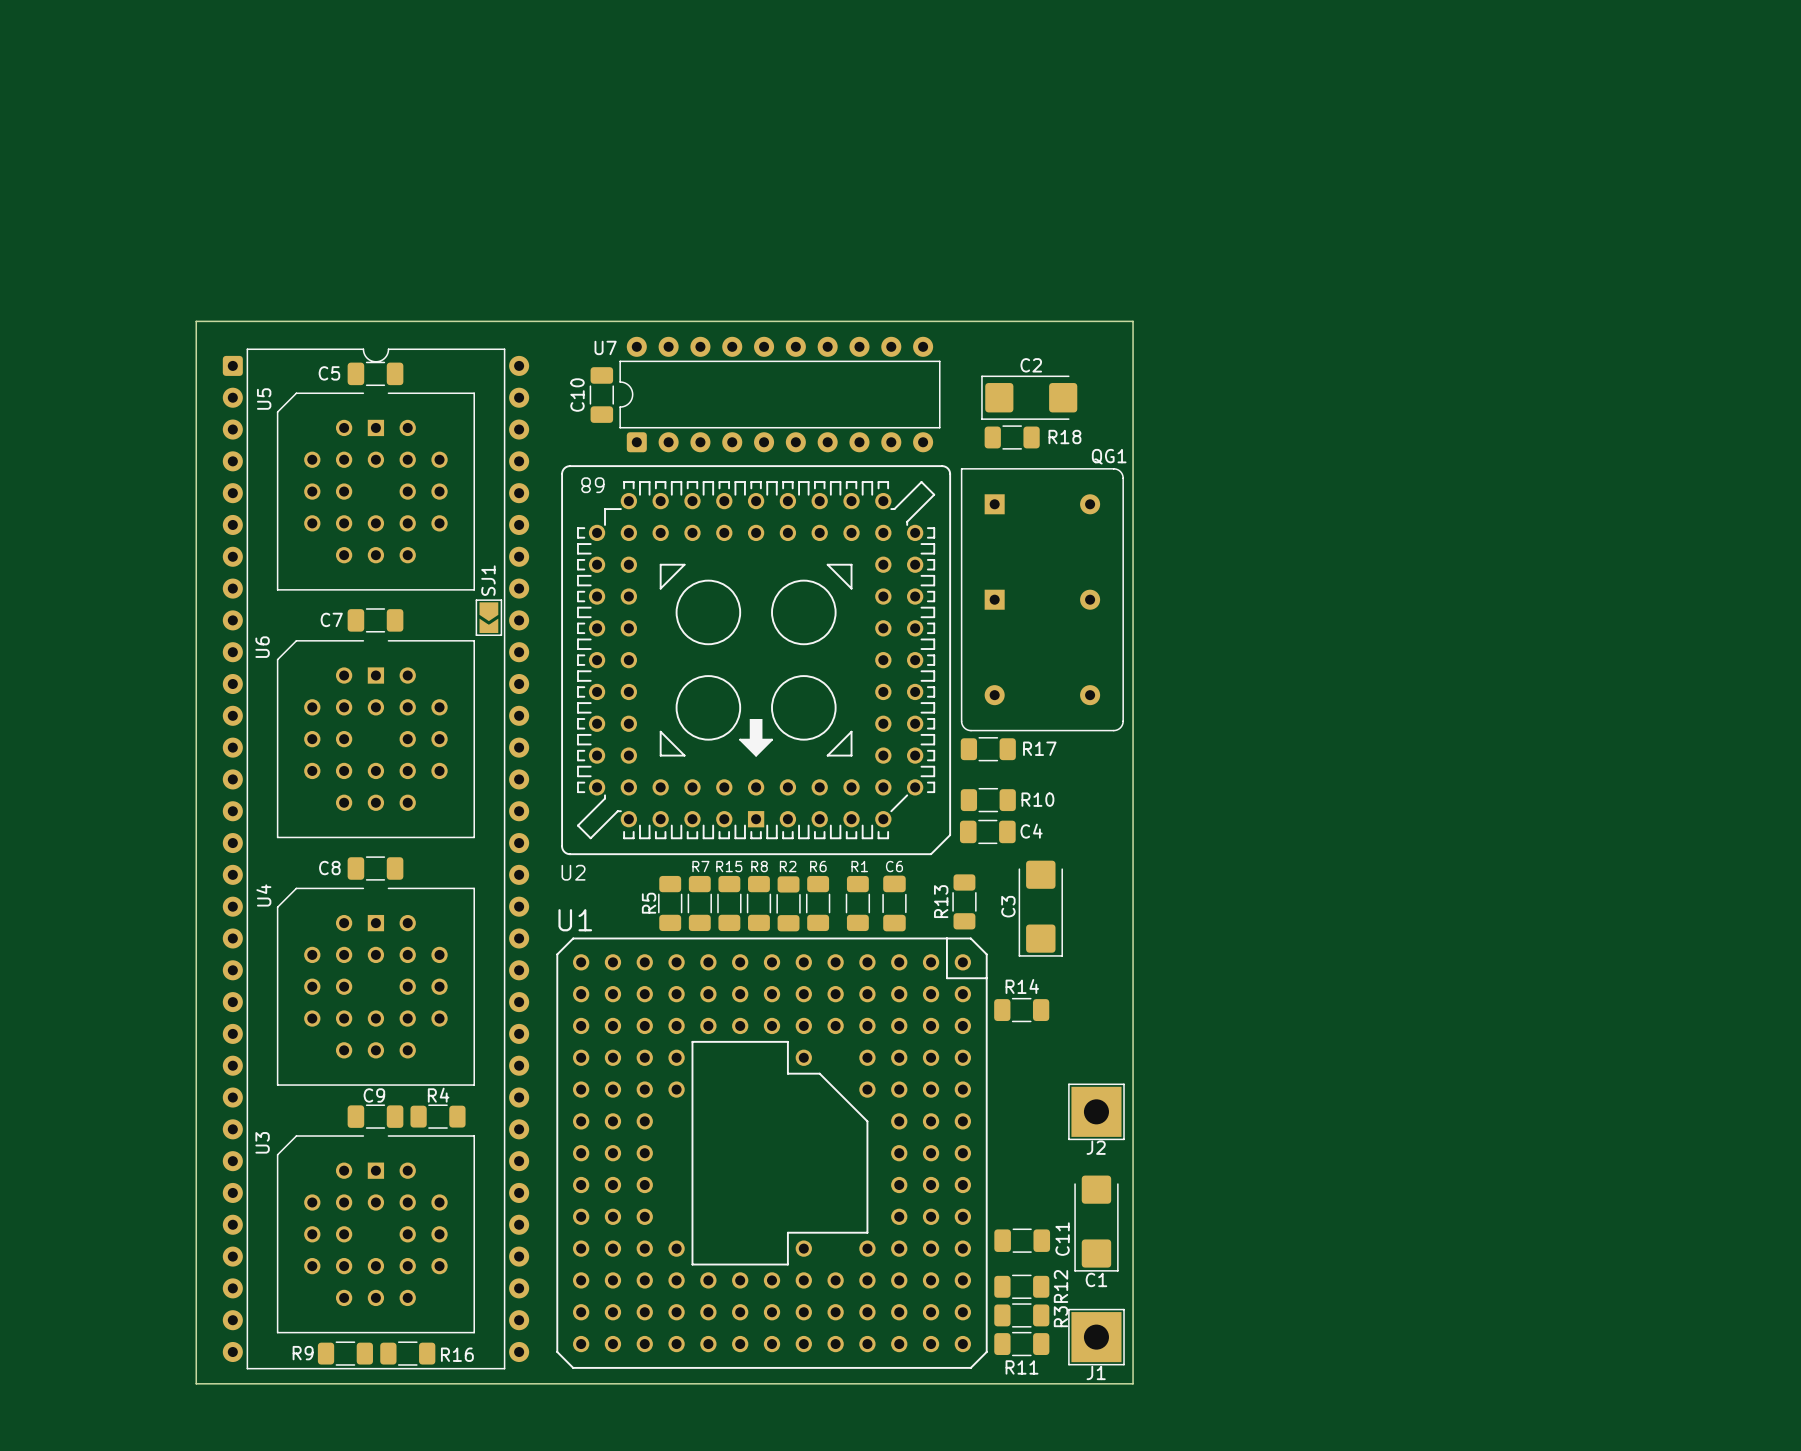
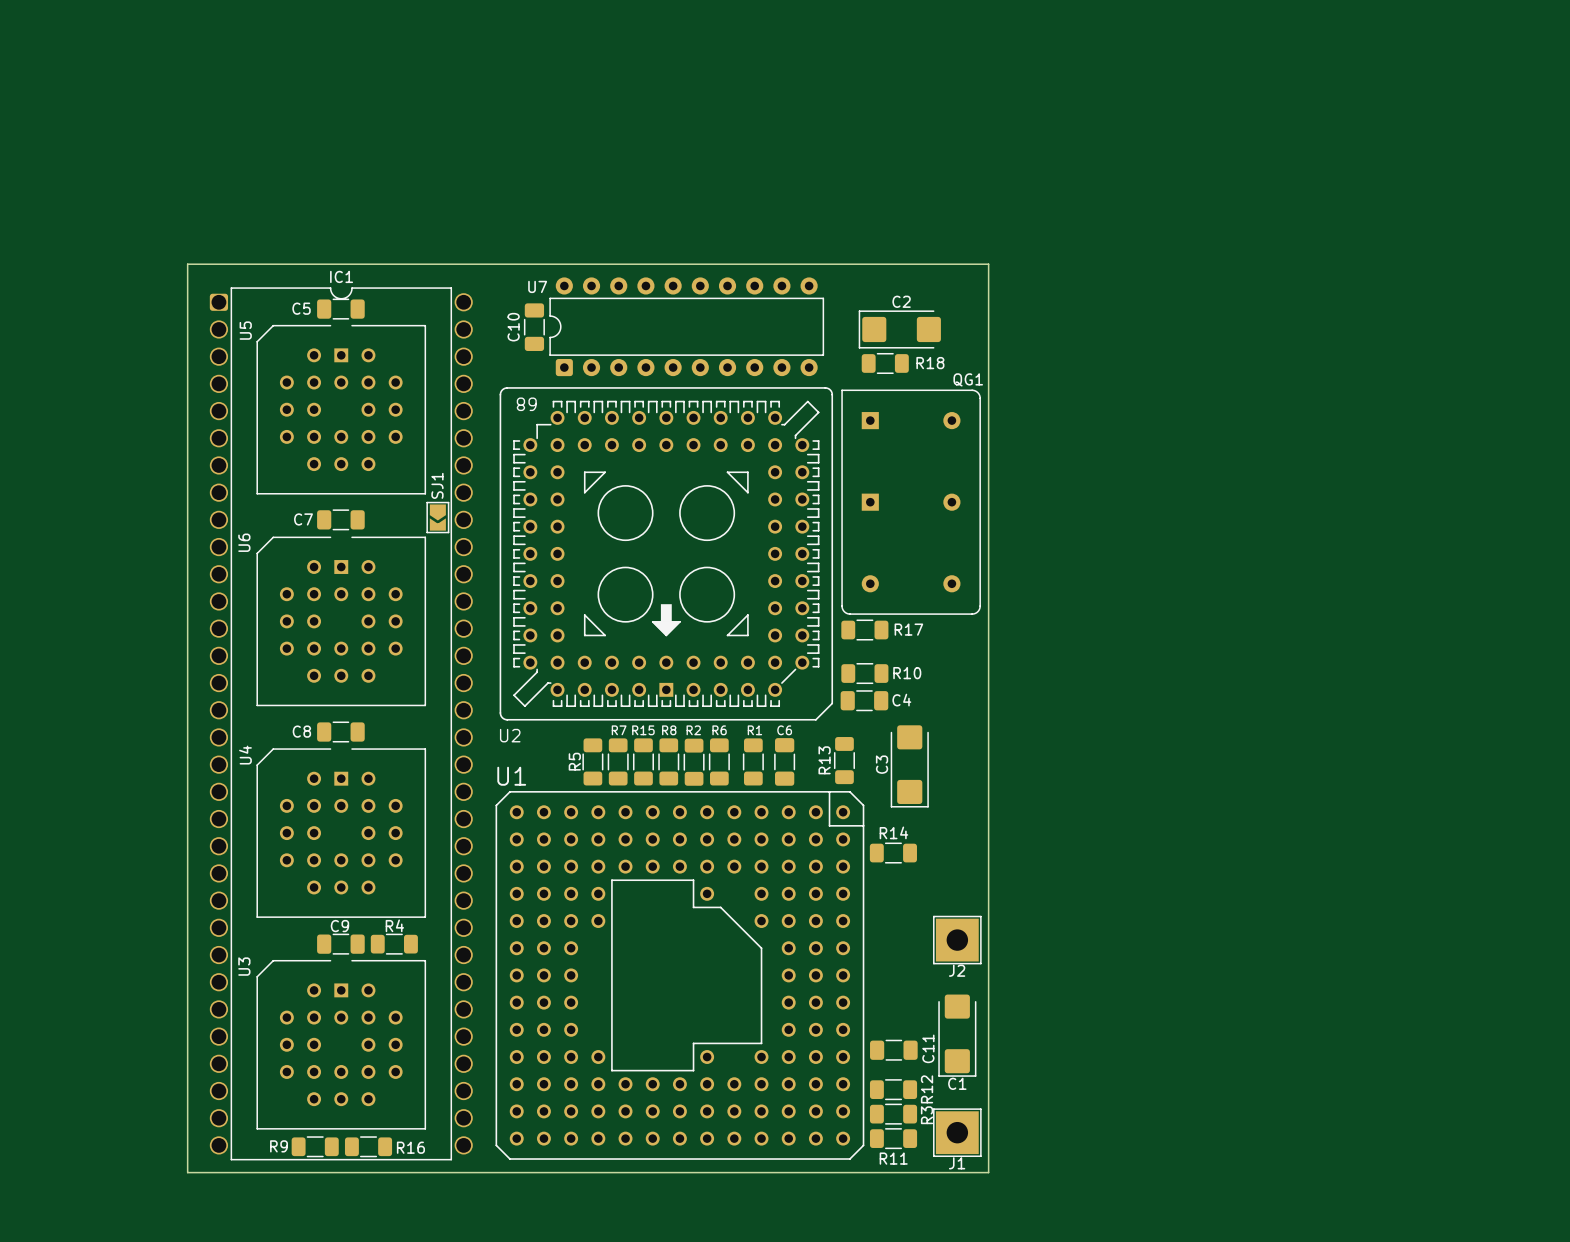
part: (375, 858) -> none
IC1: none -> (341, 723)

